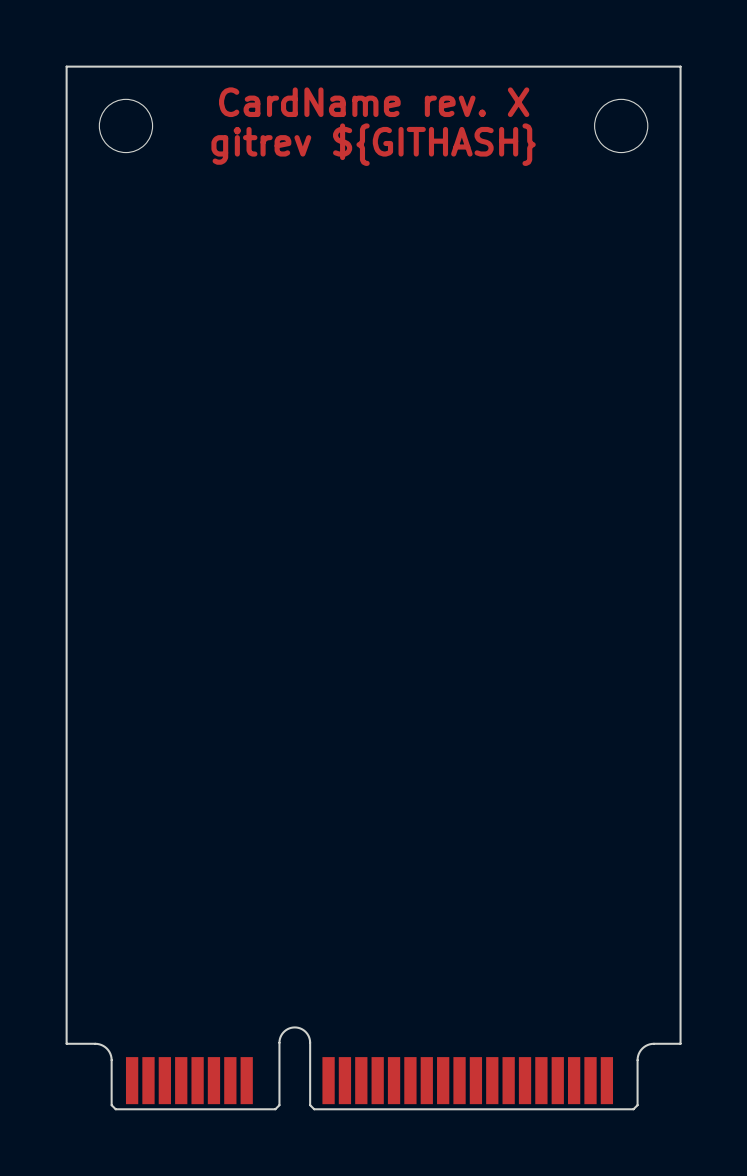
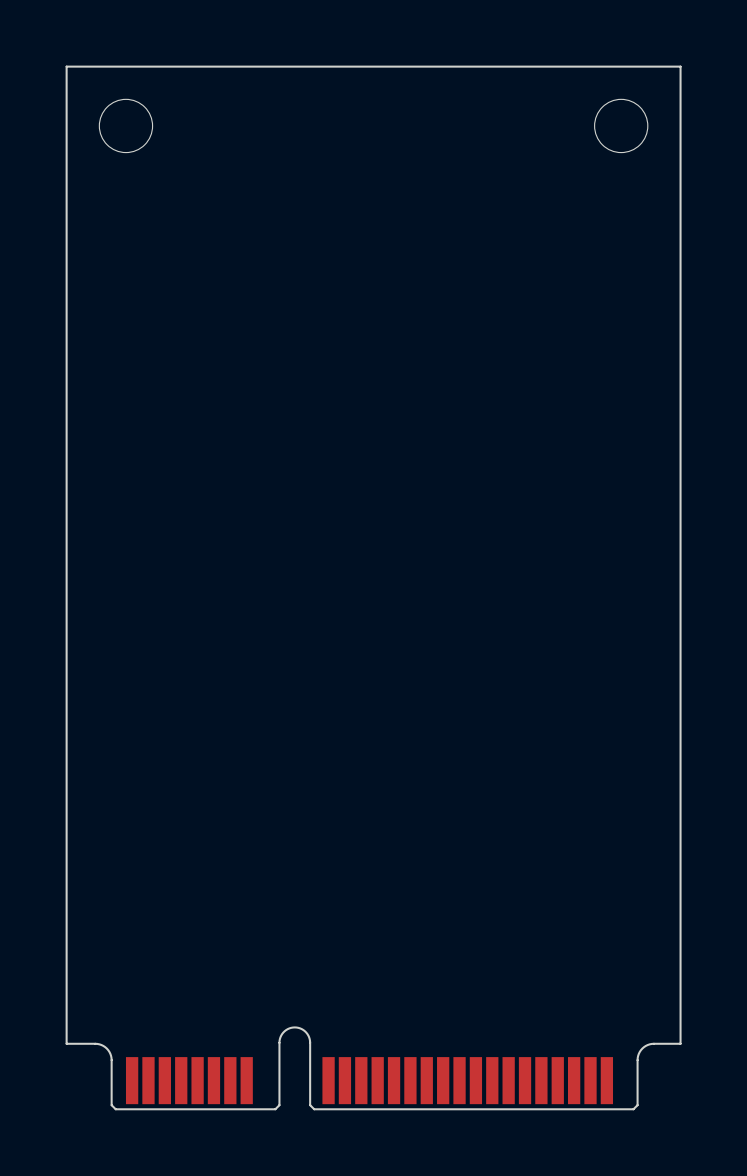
text: CardName rev. X (374, 102) -> none
text: gitrev ${GITHASH} (373, 144) -> none

